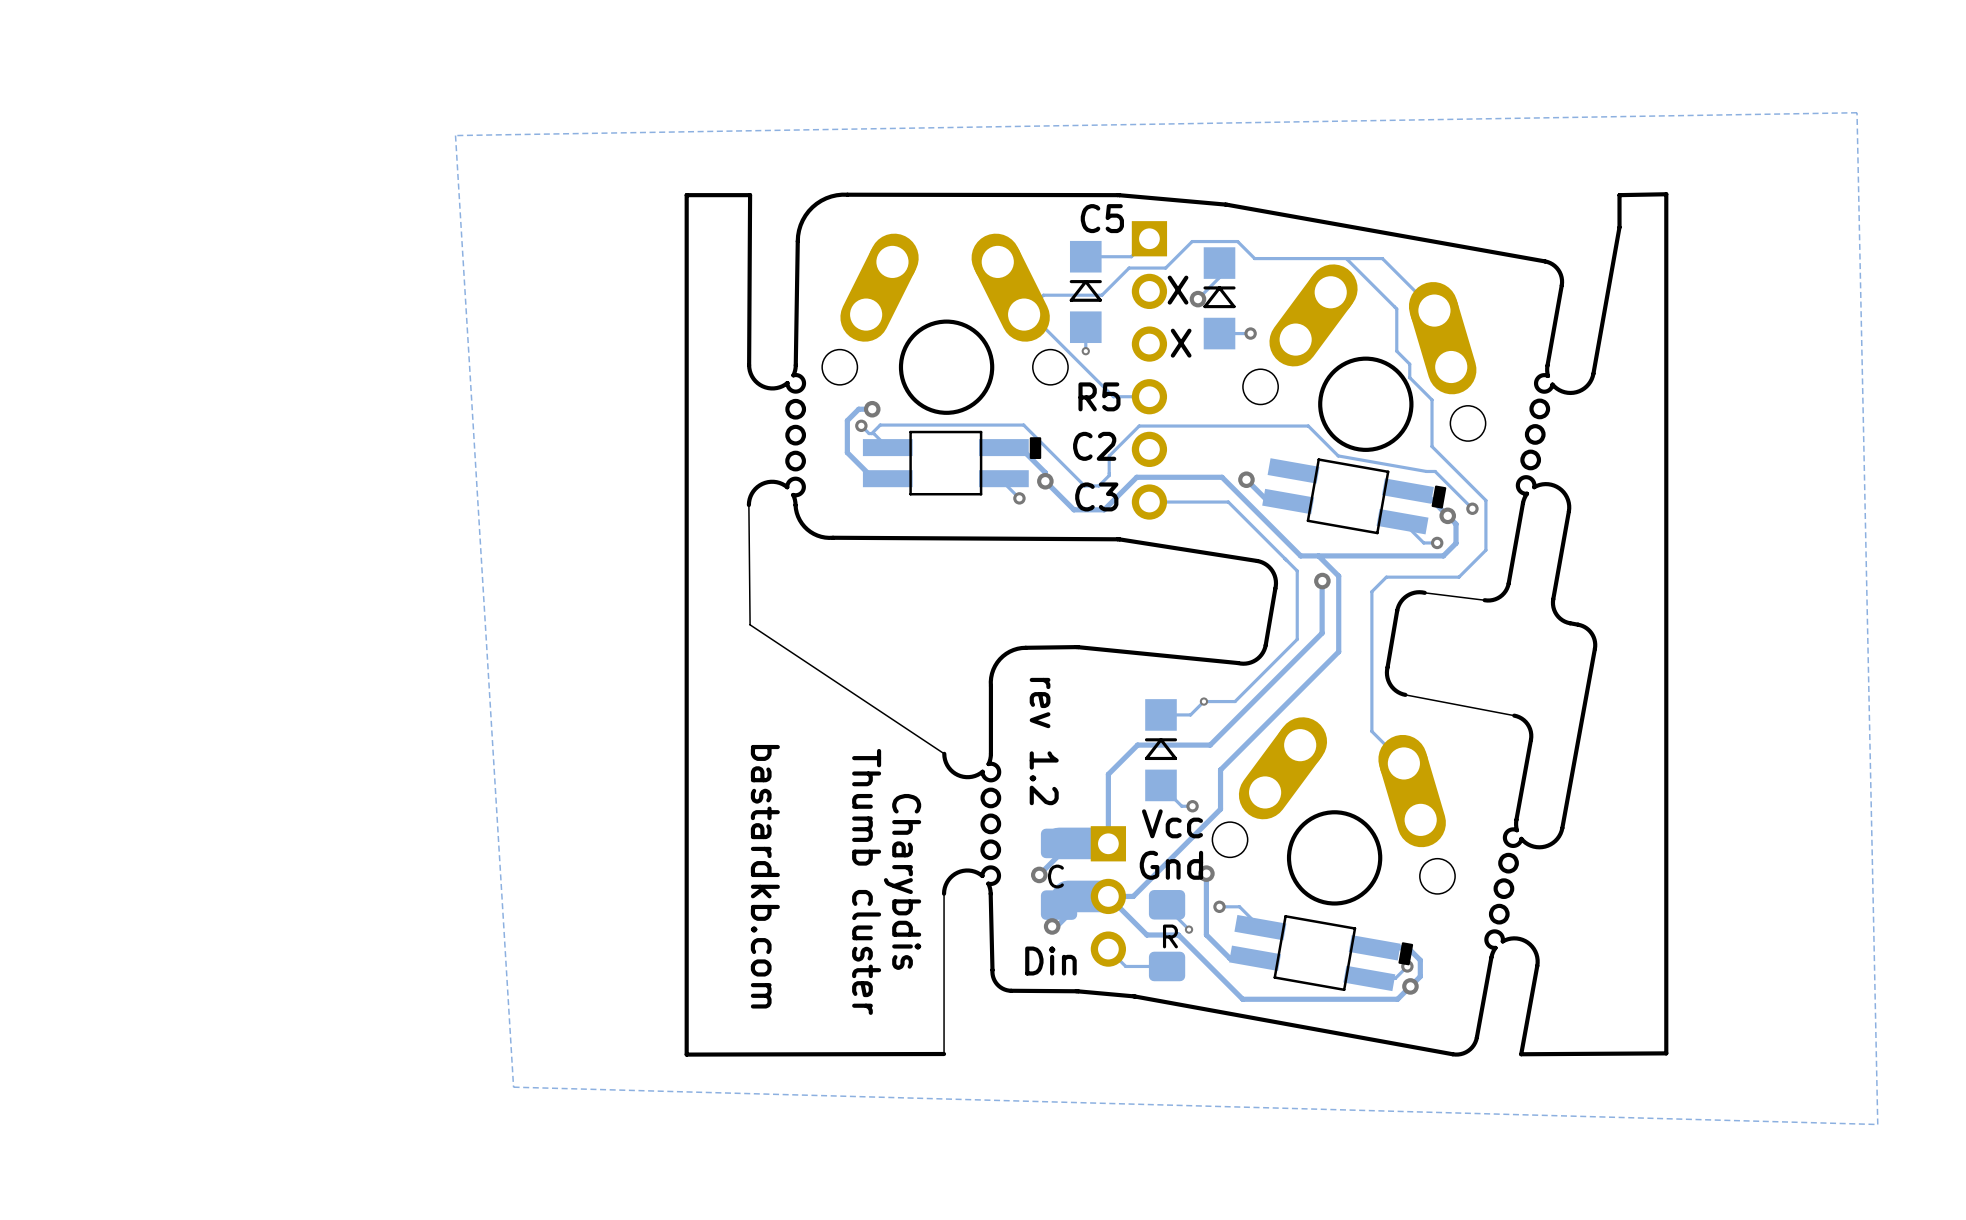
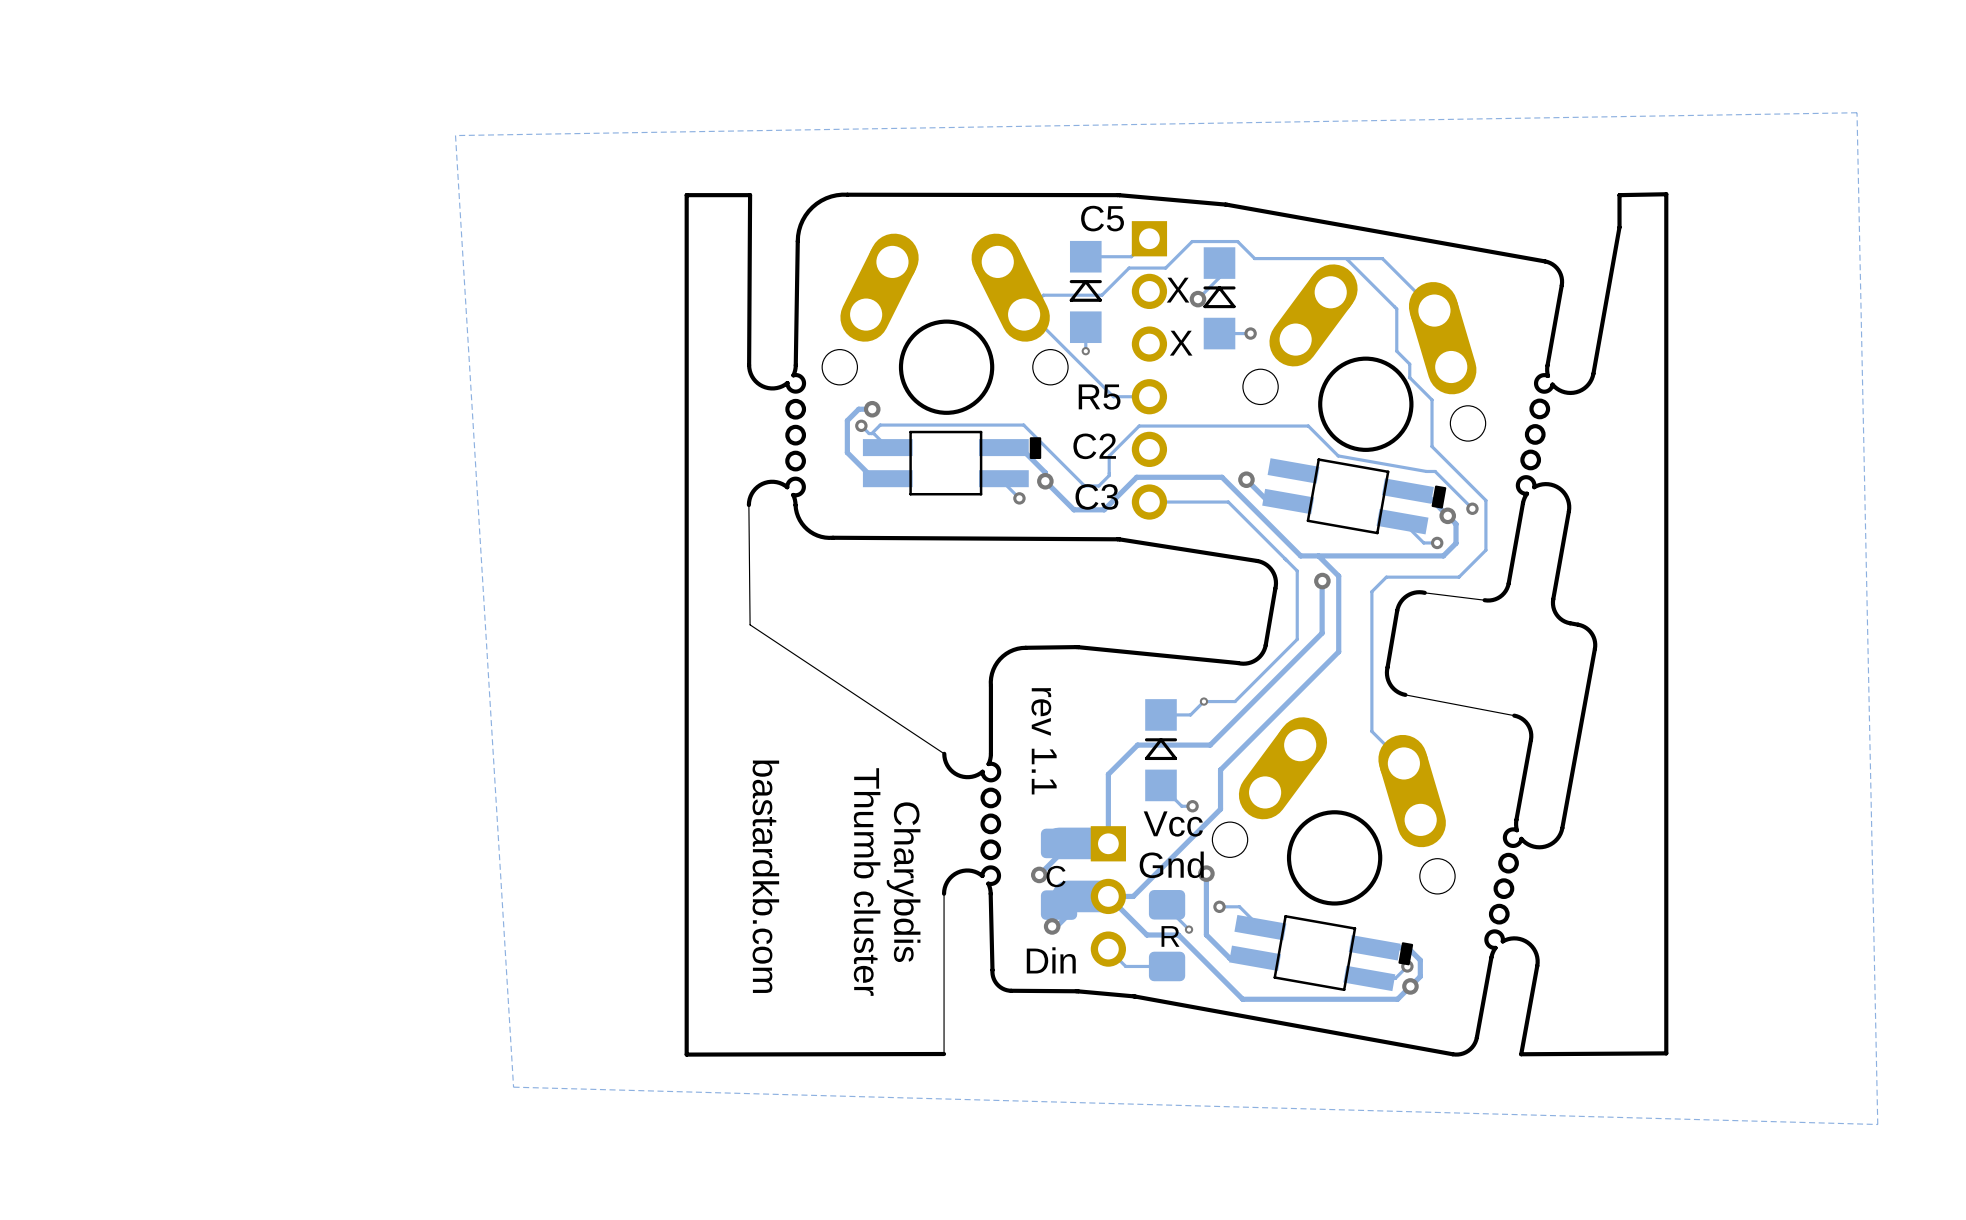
text: rev 1.2 (1044, 741) -> rev 1.1 (1044, 741)

